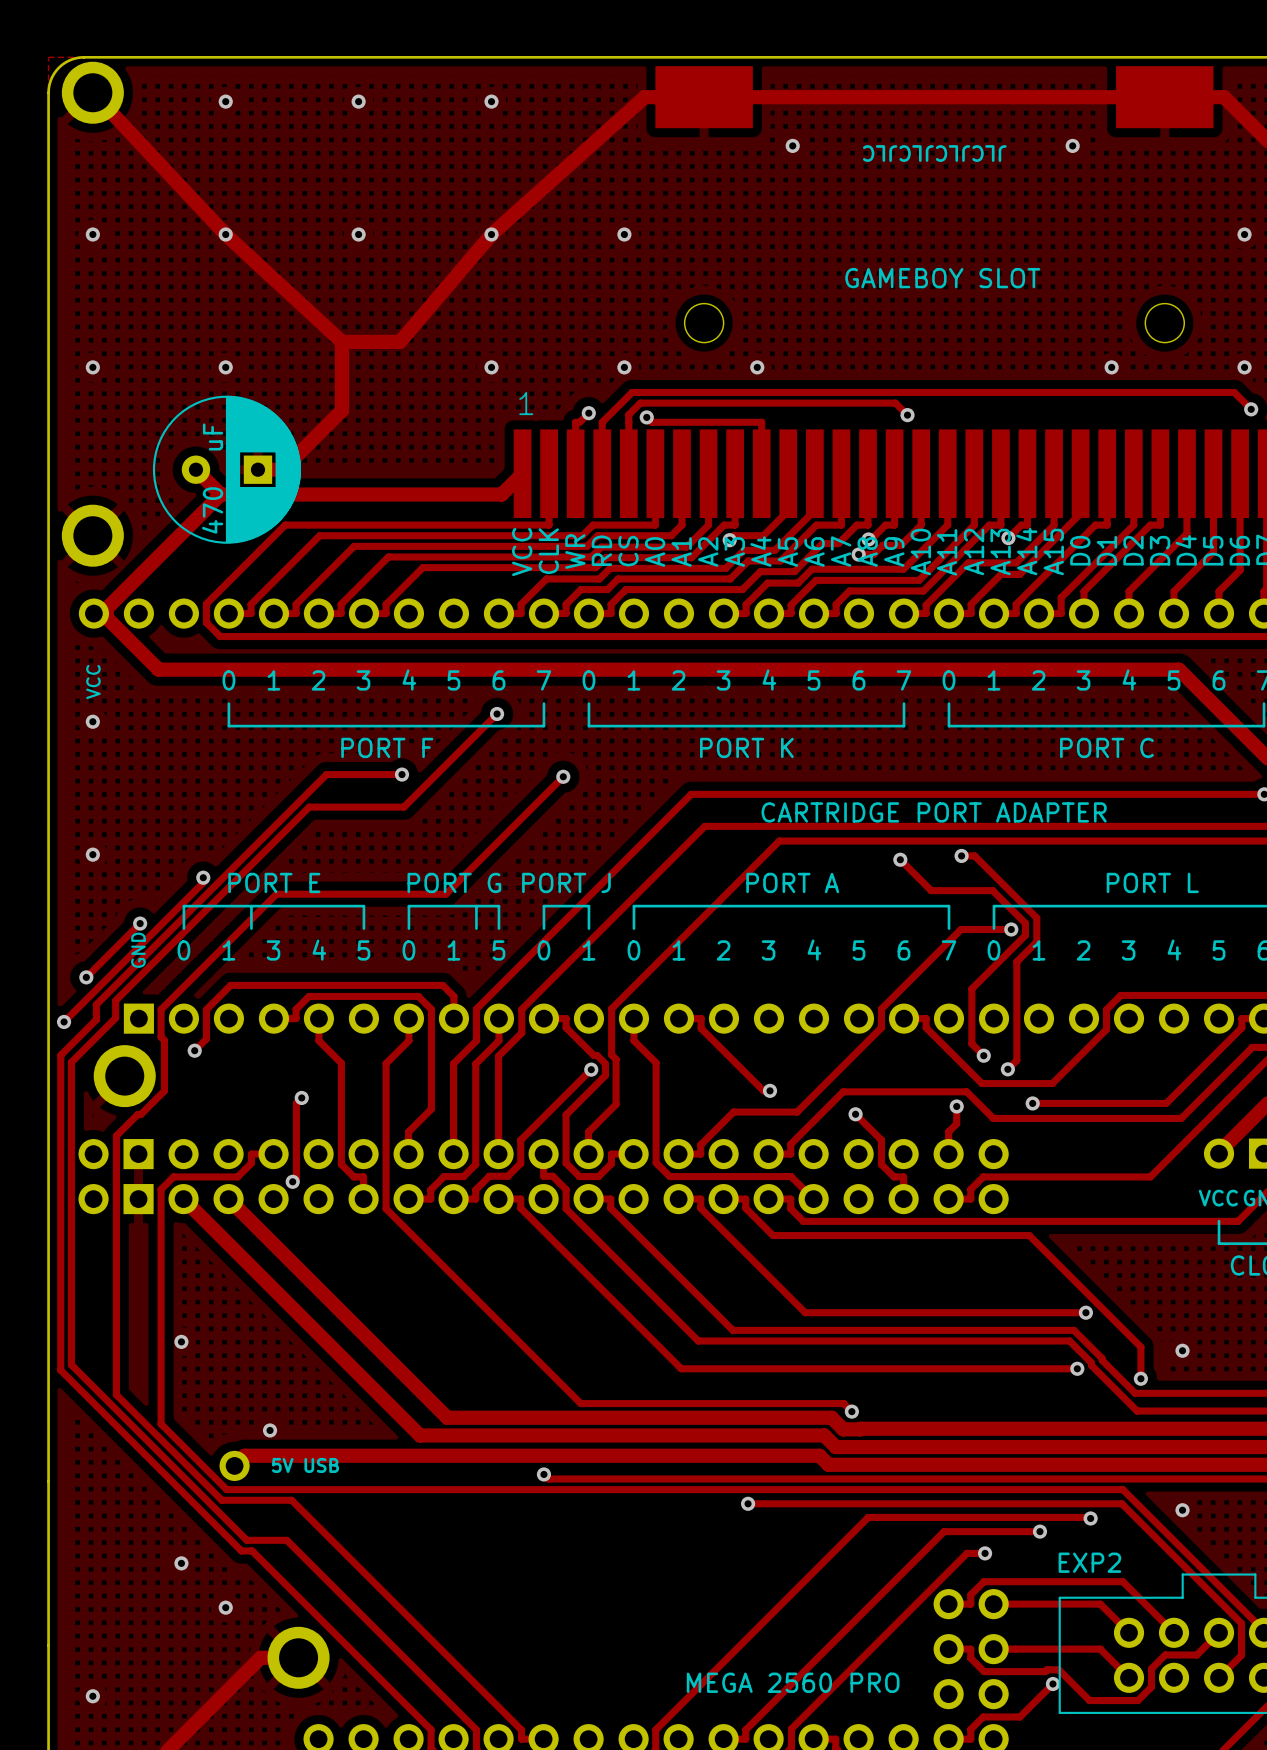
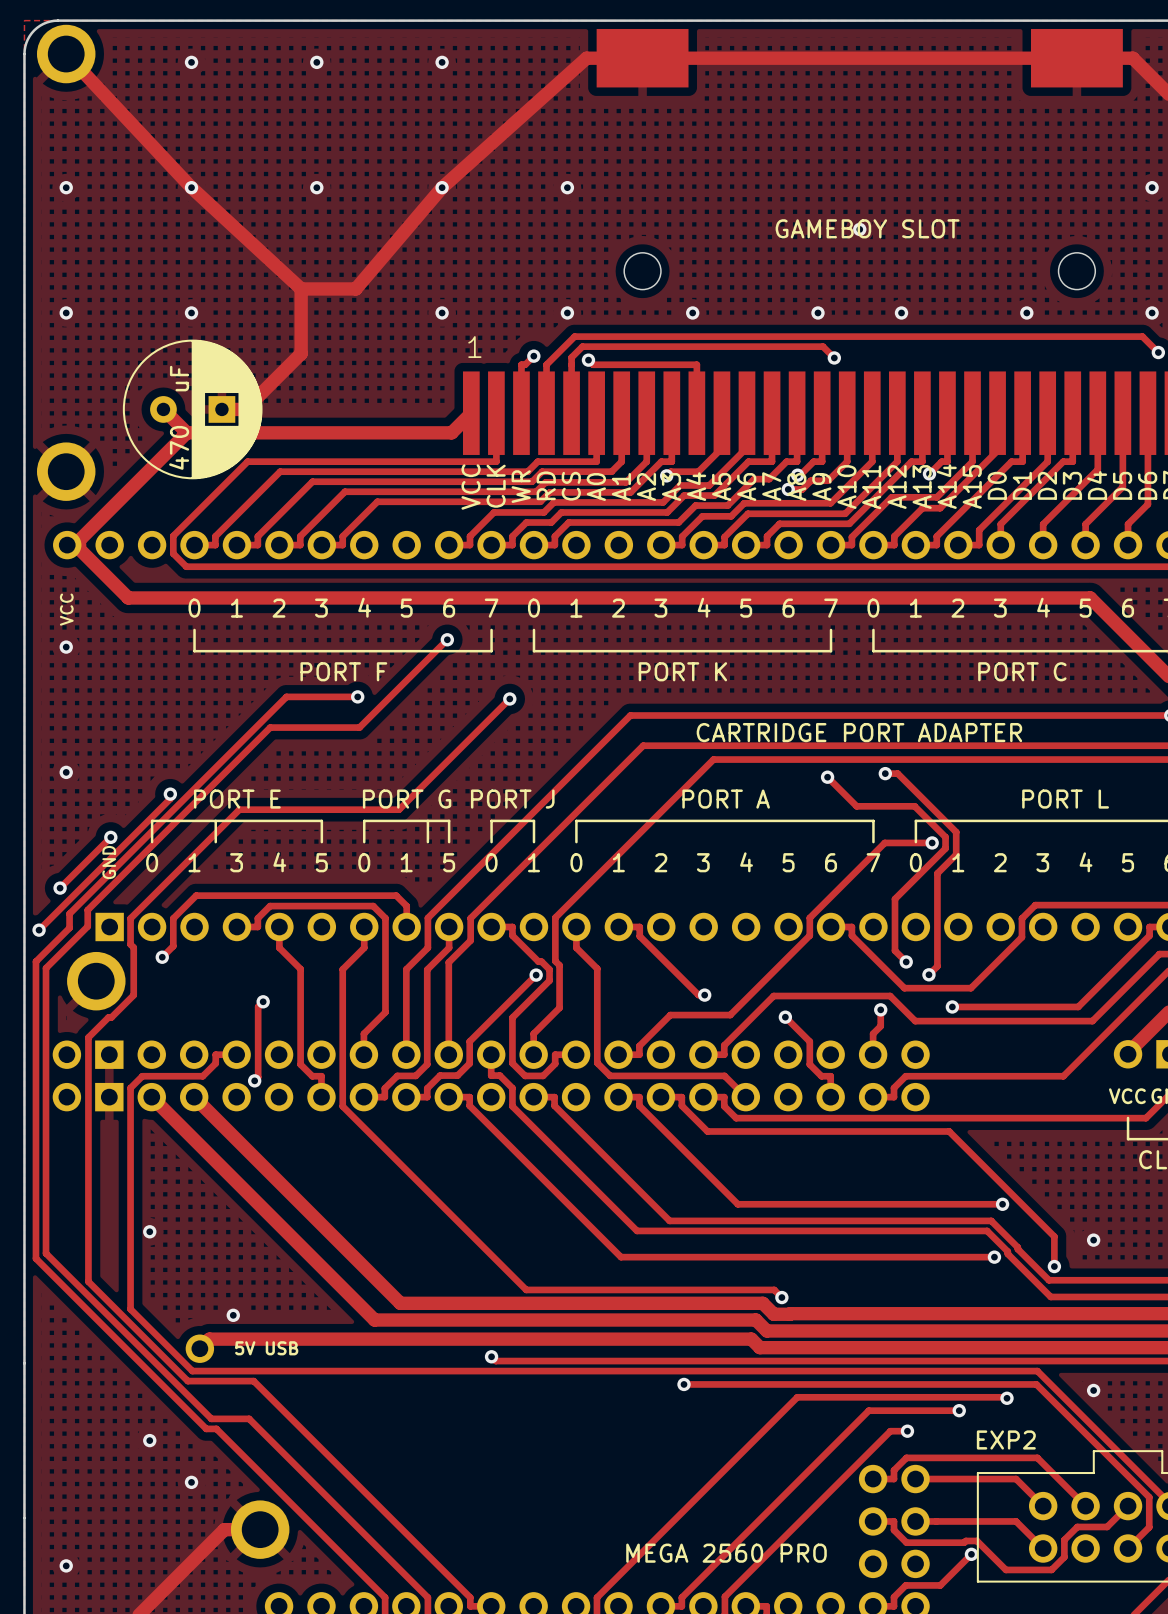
via: (792, 145) -> none
via: (1072, 145) -> none
text: JLCJLCJLCJLC (934, 153) -> none
via: none -> (859, 229)
via: none -> (817, 312)
via: none -> (901, 312)

